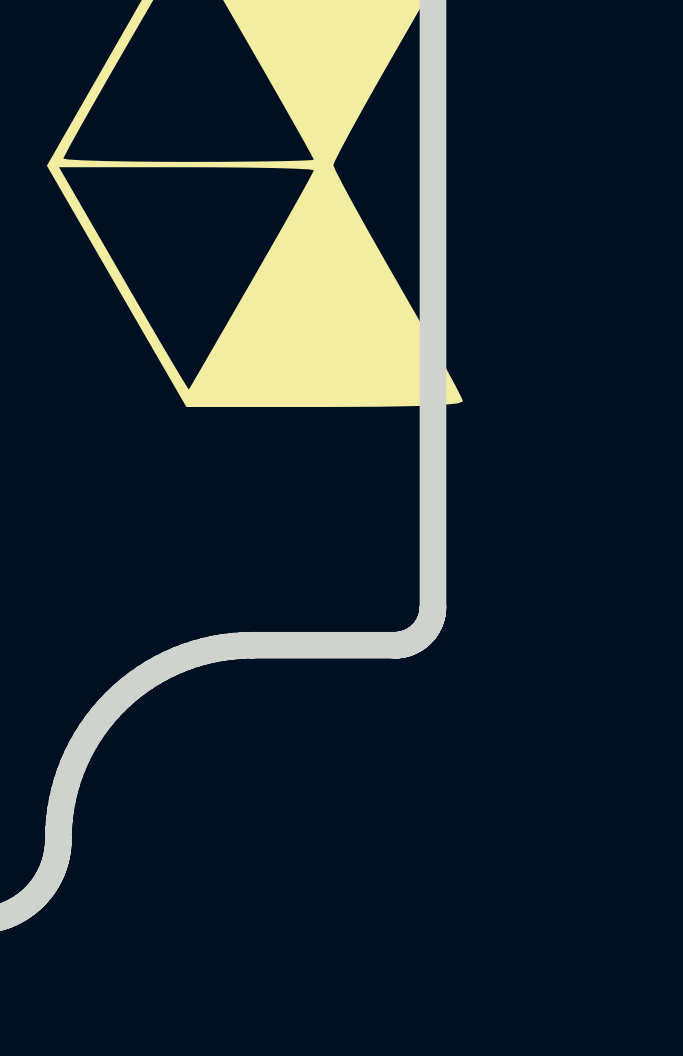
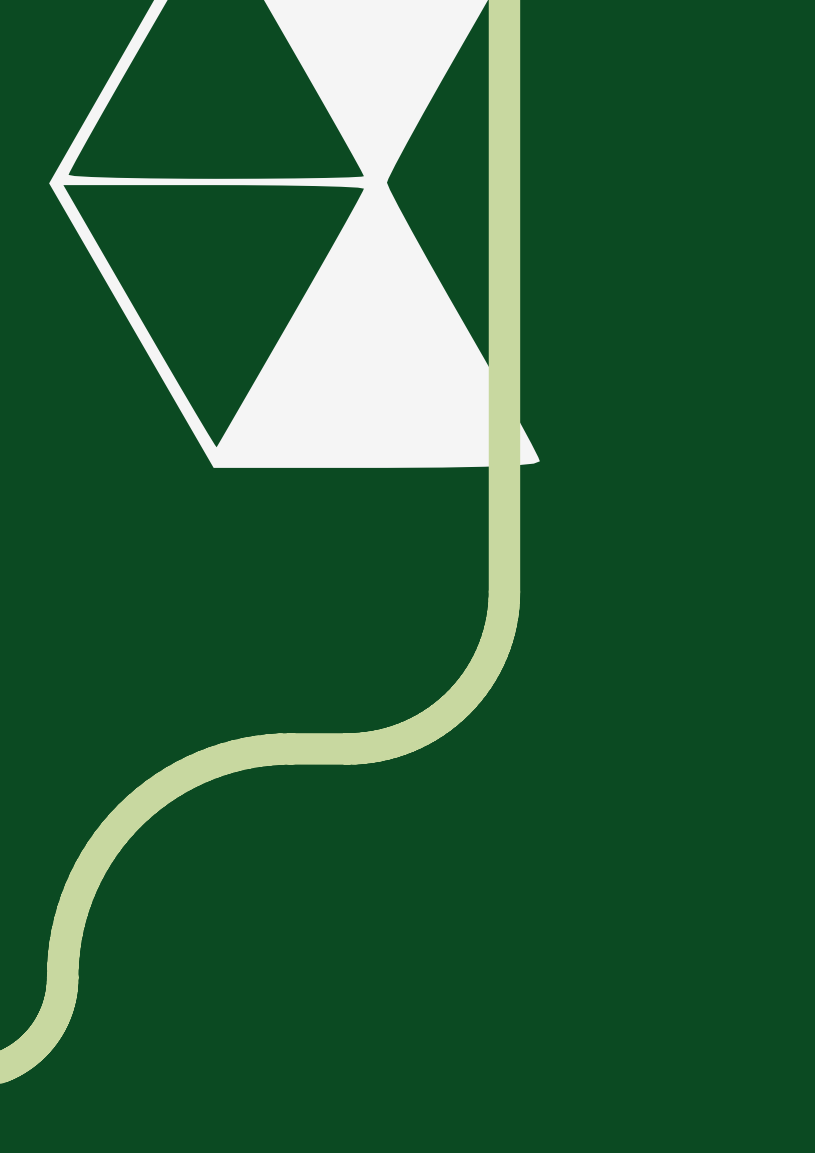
board edge: (432, 512) (432, 610) (427, 626) (417, 637) (407, 643) (396, 645) (252, 645) -> (504, 591) (499, 630) (485, 665) (463, 697) (440, 718) (414, 733) (378, 745) (355, 748) (291, 748)

